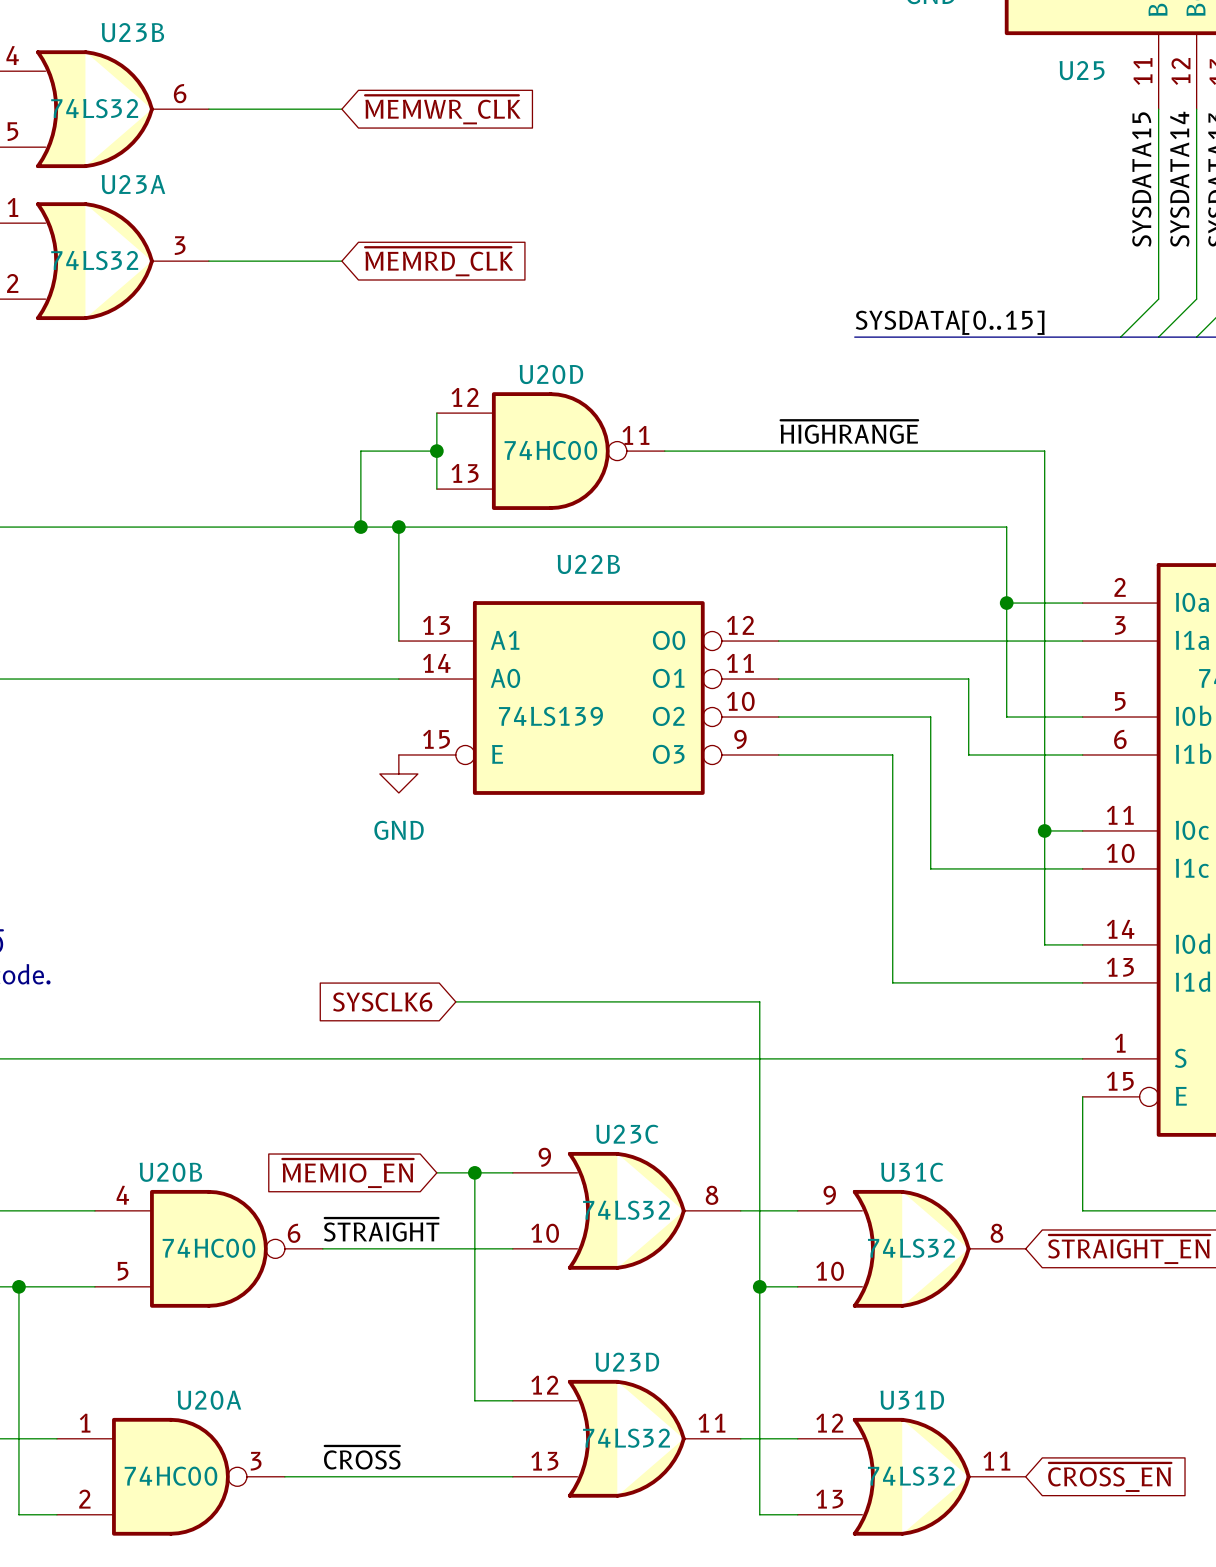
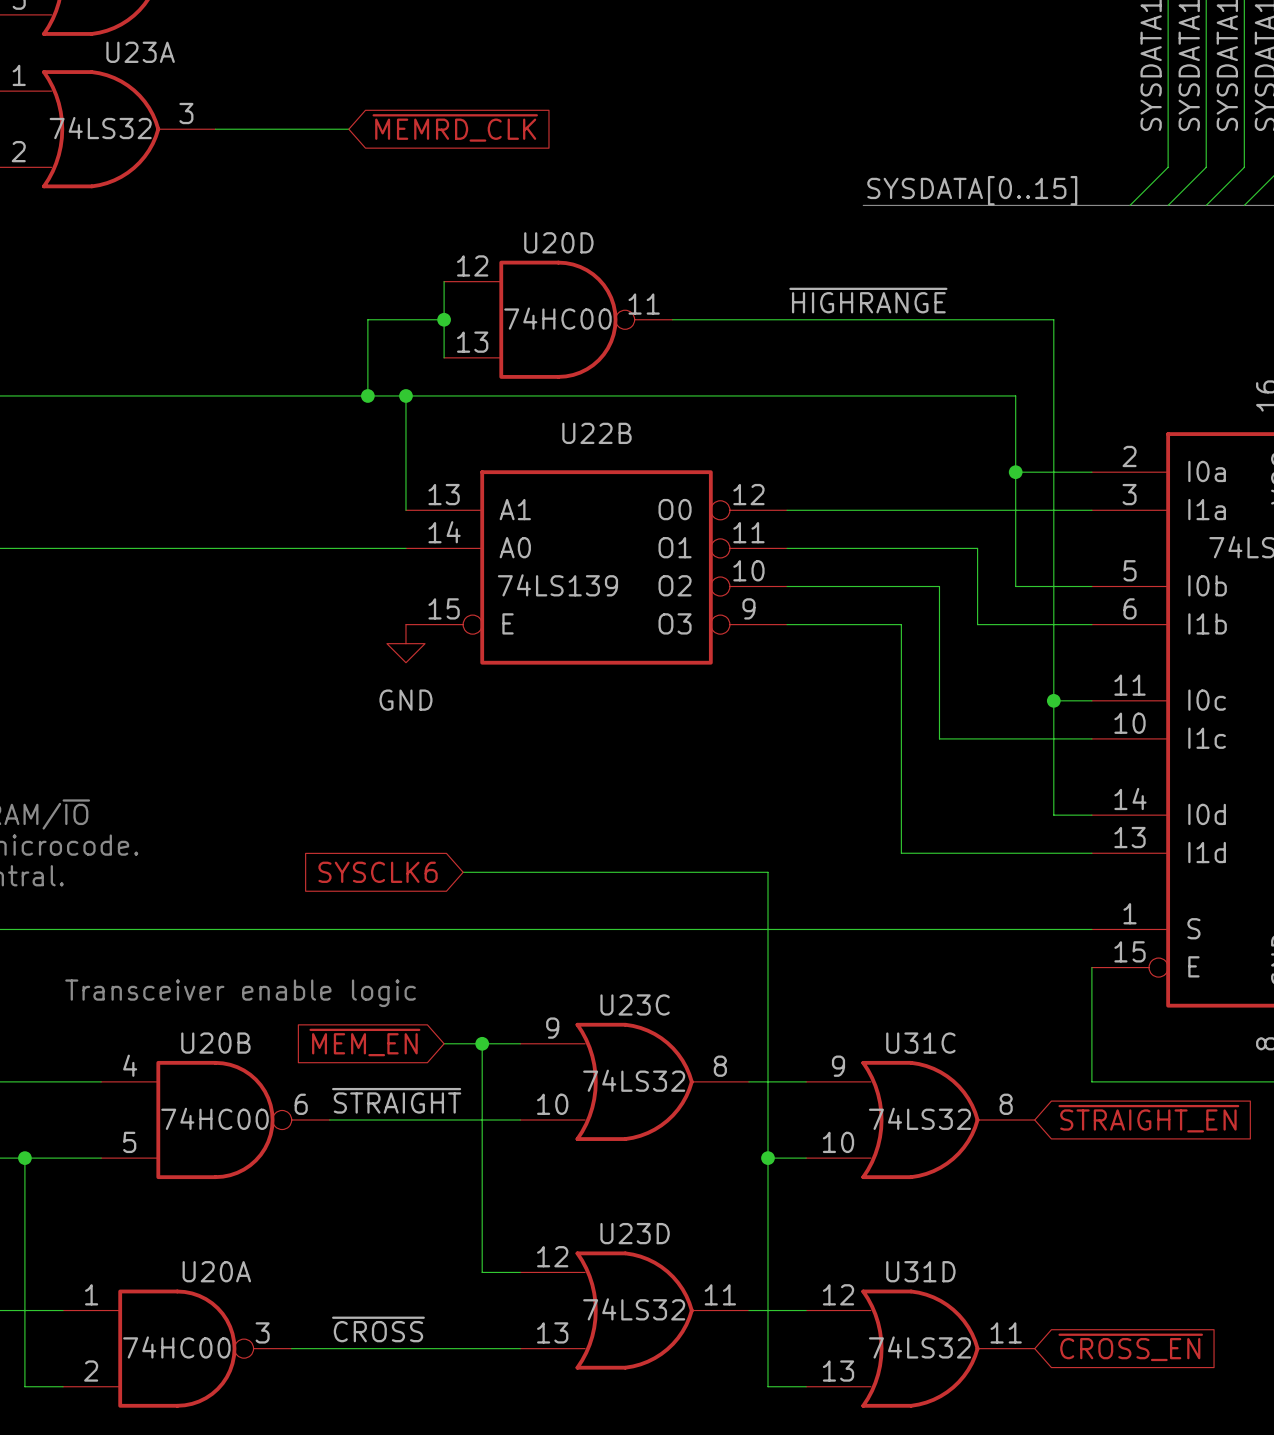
text: none -> Transceiver enable logic (240, 993)
U20B name position: U20B (170, 1172) -> U20B (215, 1043)
global label: ~{MEMIO_EN} (348, 1173) -> ~{MEM_EN} (364, 1042)

